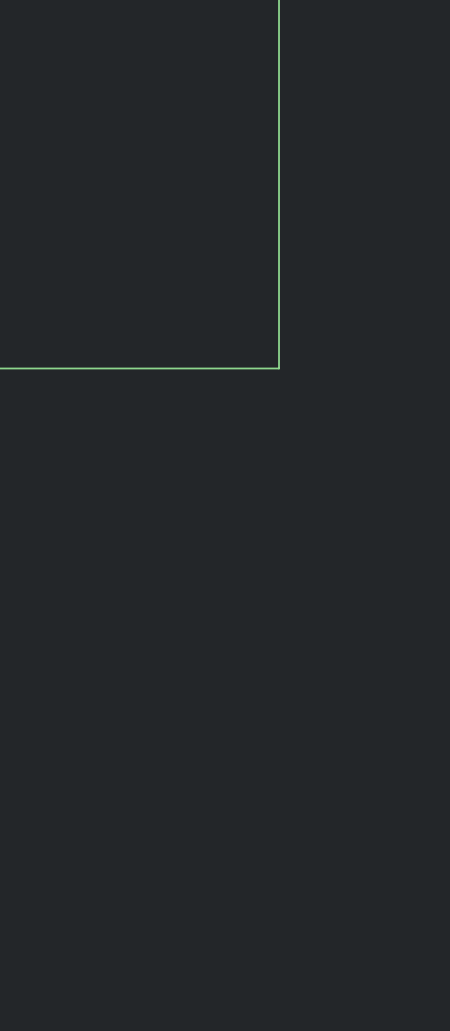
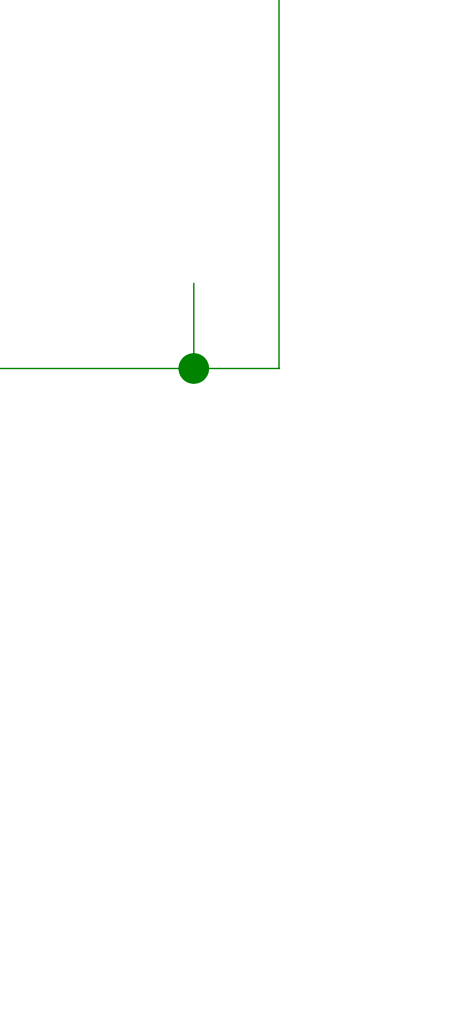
wire: none -> (193, 283) (193, 368)
junction: none -> (193, 368)

